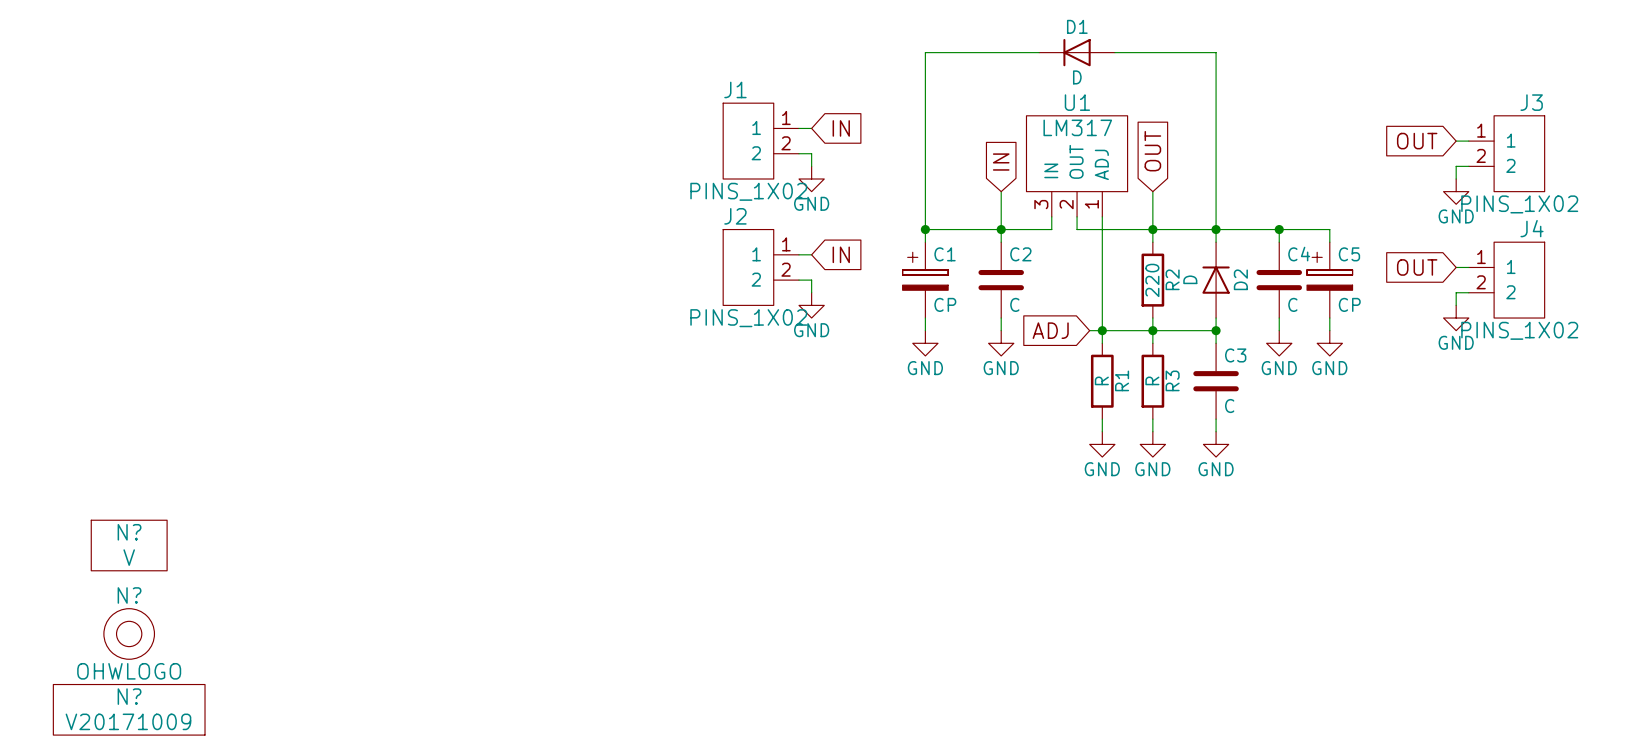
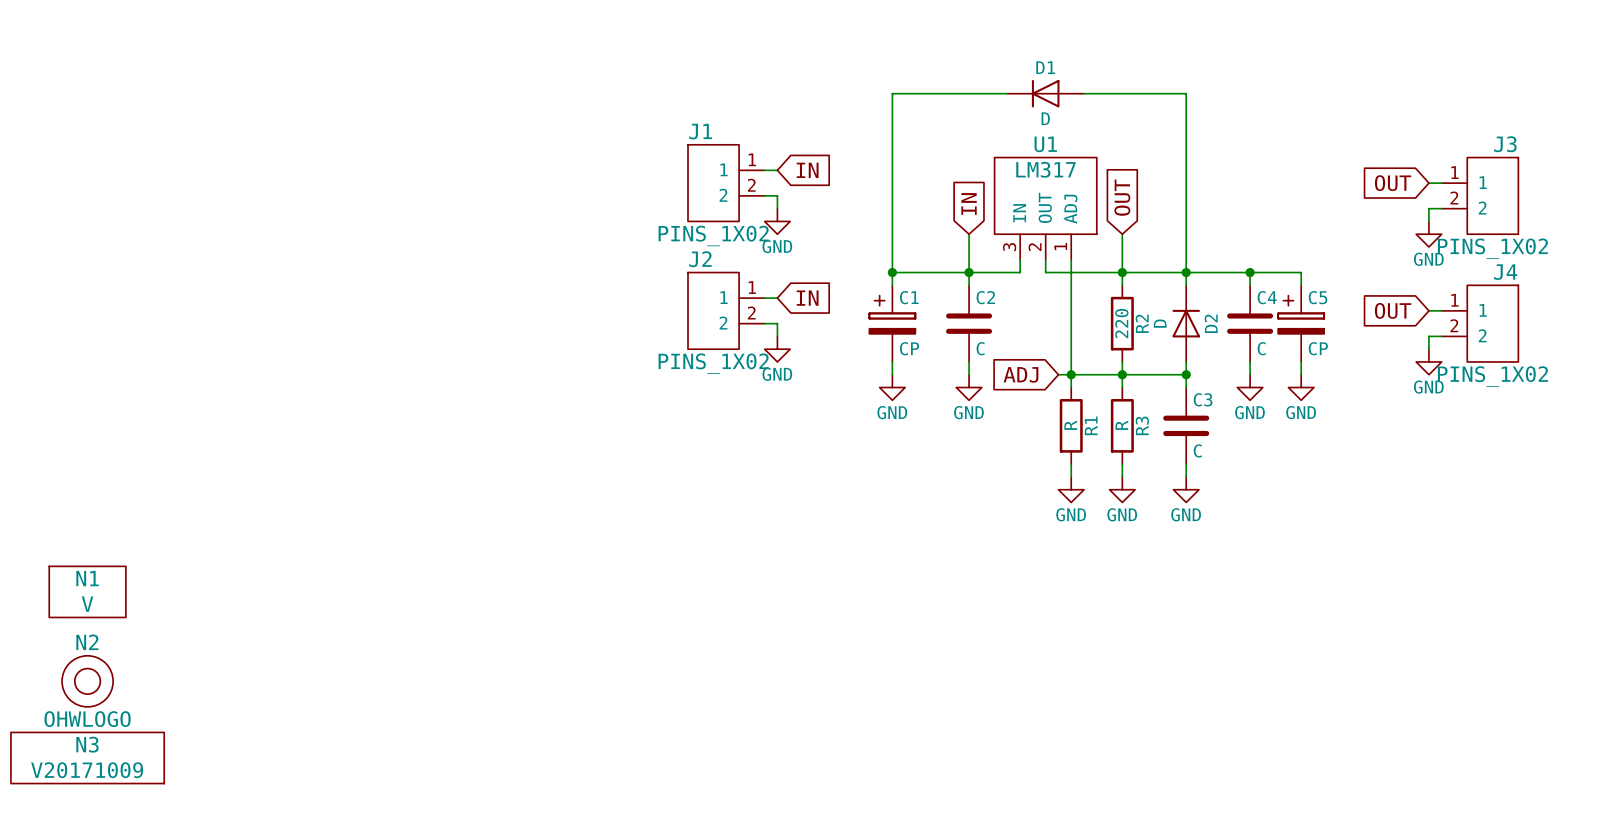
N? name: N? (129, 532) -> N1 (87, 578)
N? name: N? (129, 595) -> N2 (87, 642)
N? name: N? (129, 696) -> N3 (87, 744)

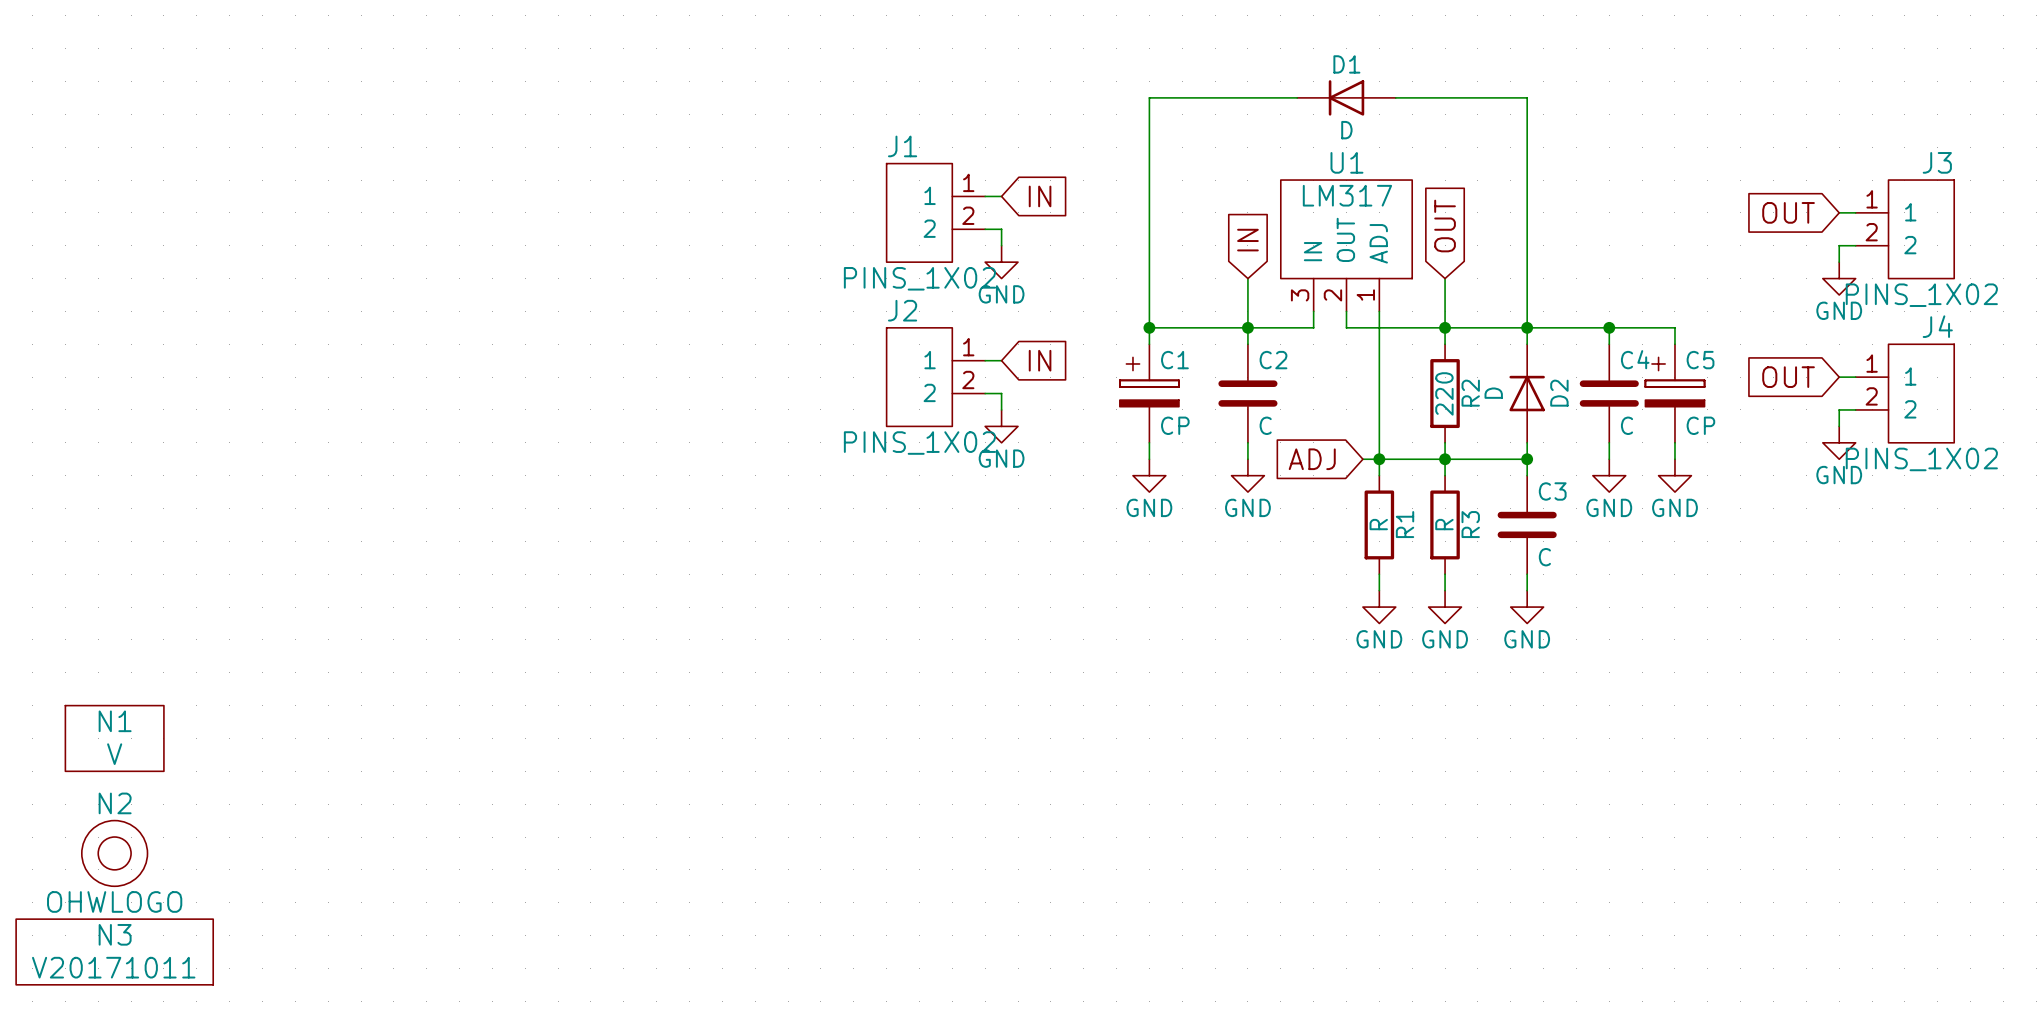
N3 value: V20171009 (87, 770) -> V20171011 (113, 967)

